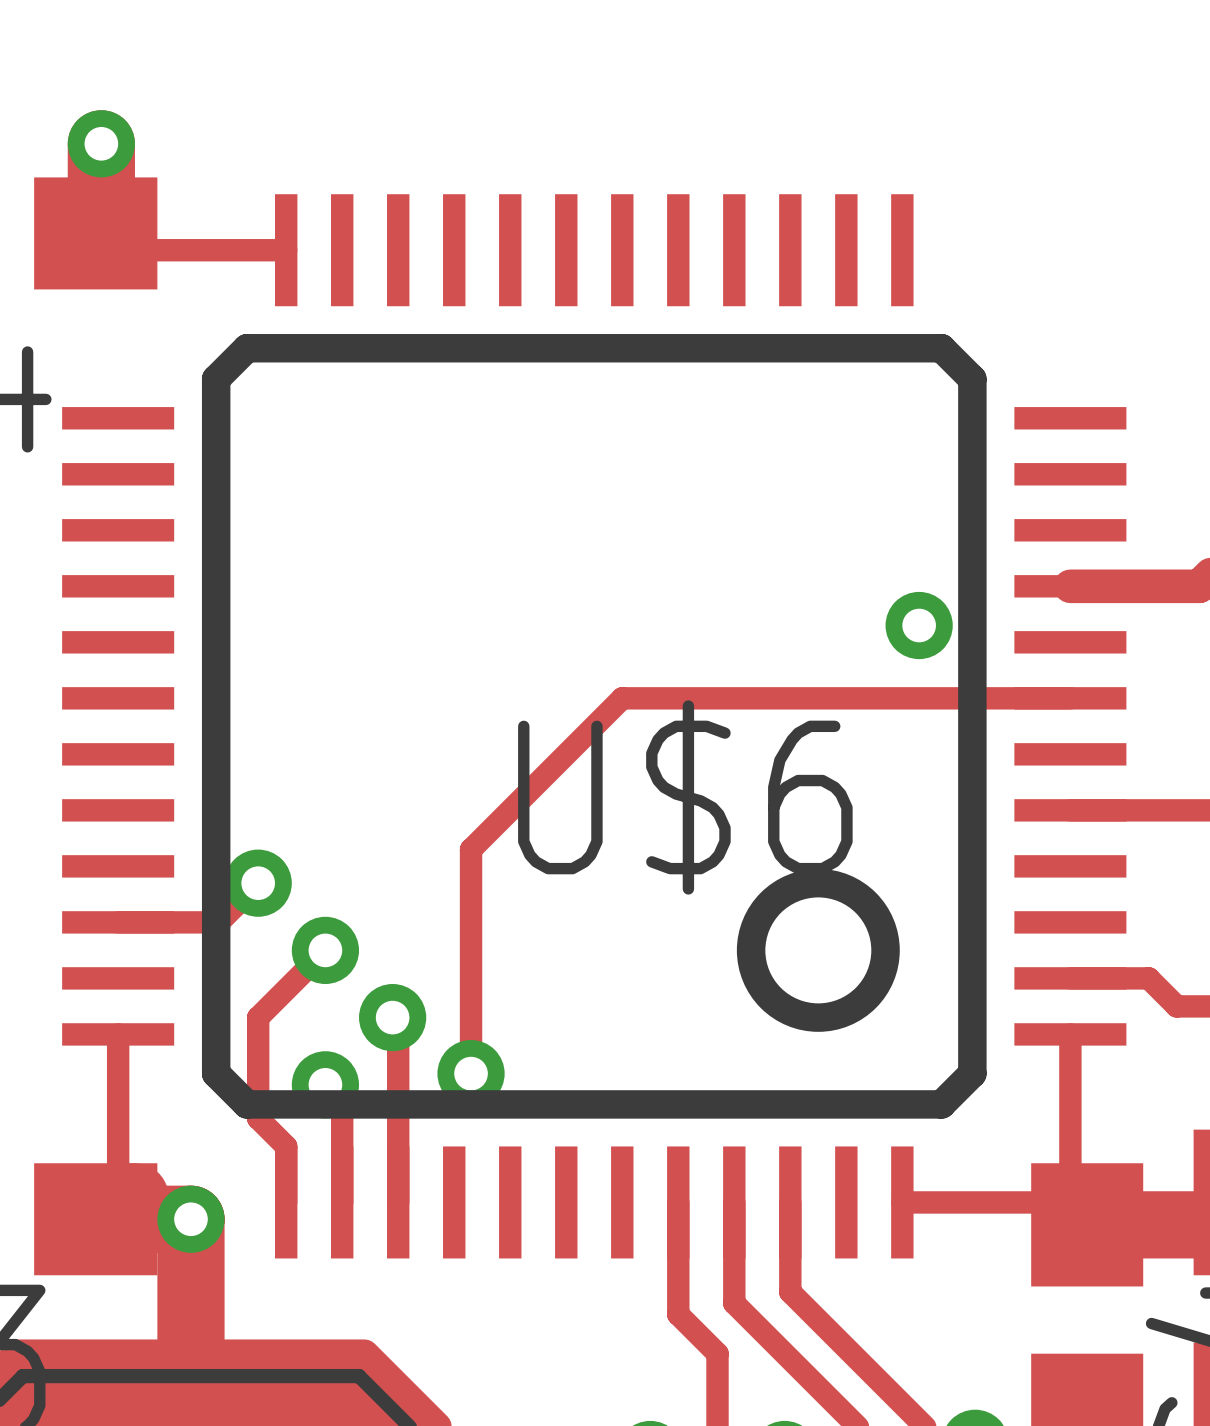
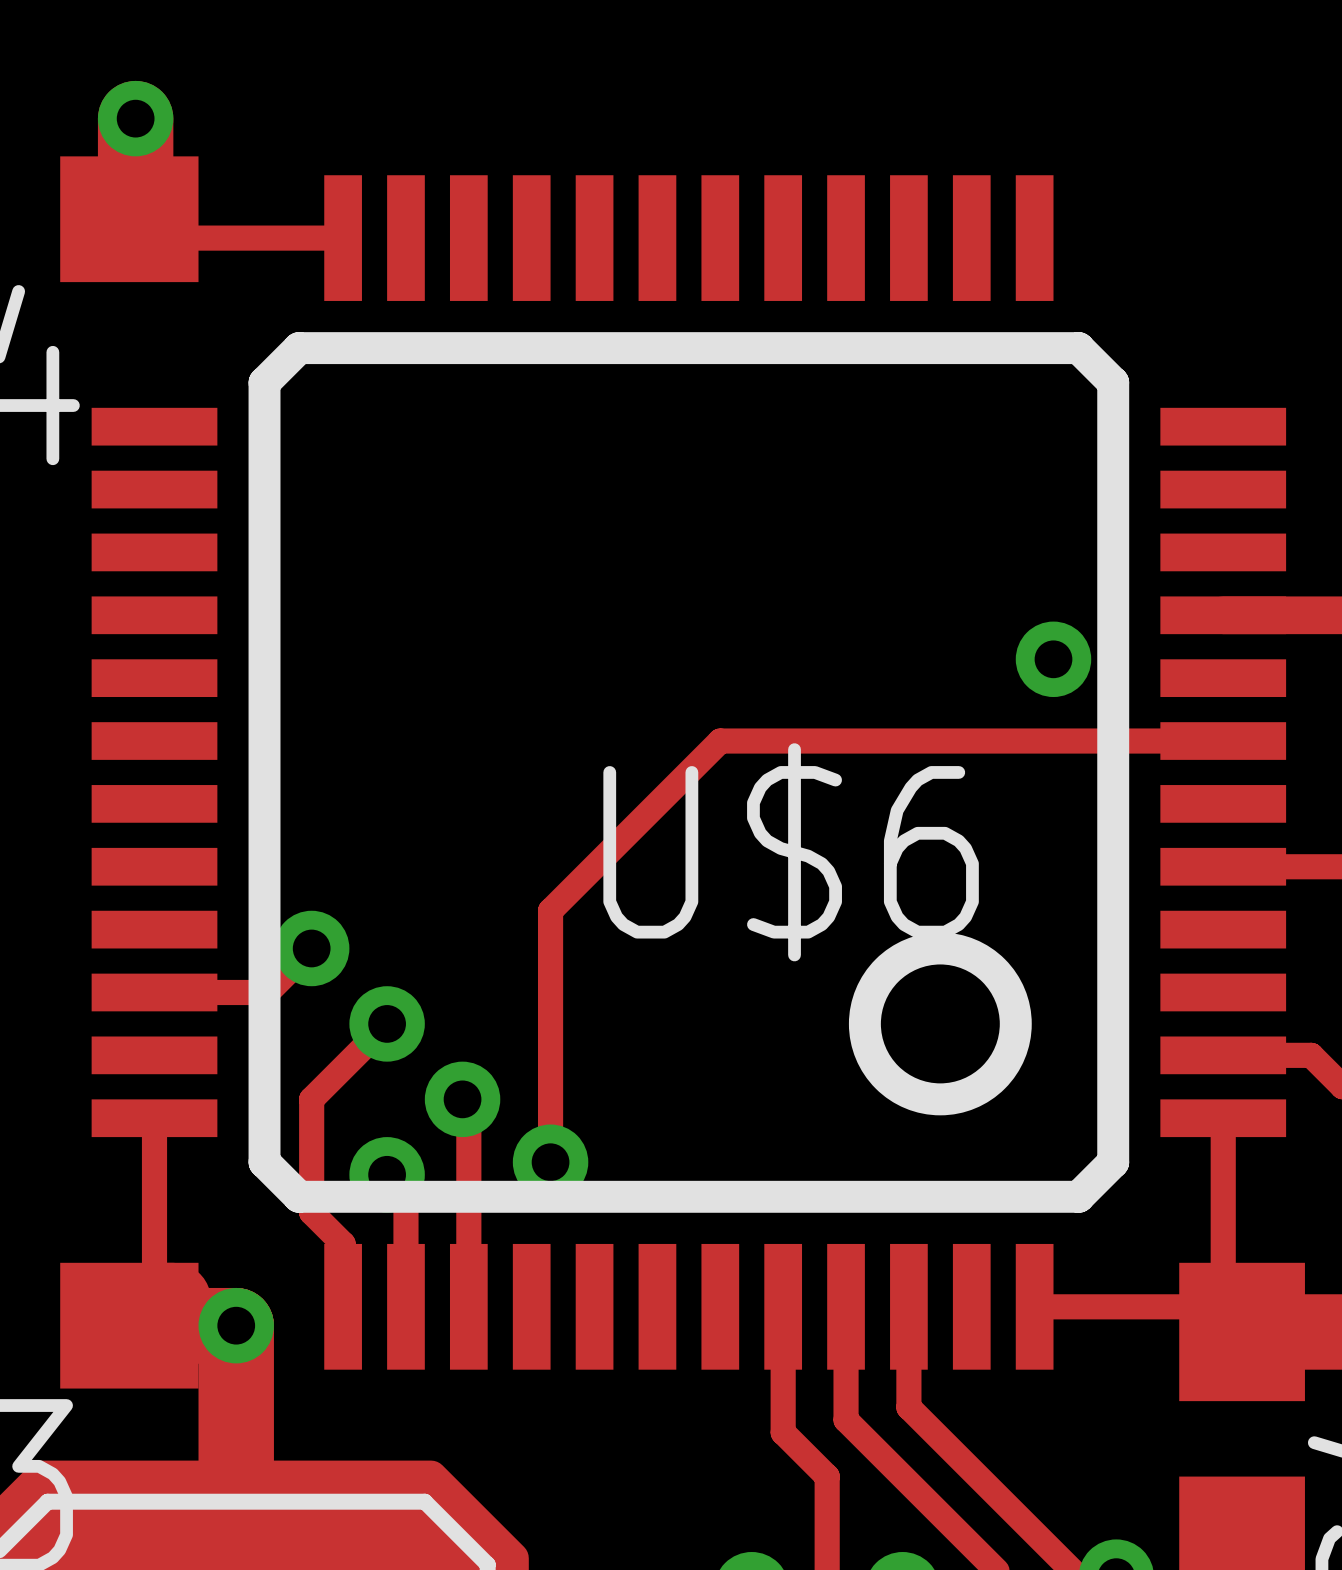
U$6 footprint: [62, 194, 1127, 1259] -> [91, 175, 1287, 1370]

